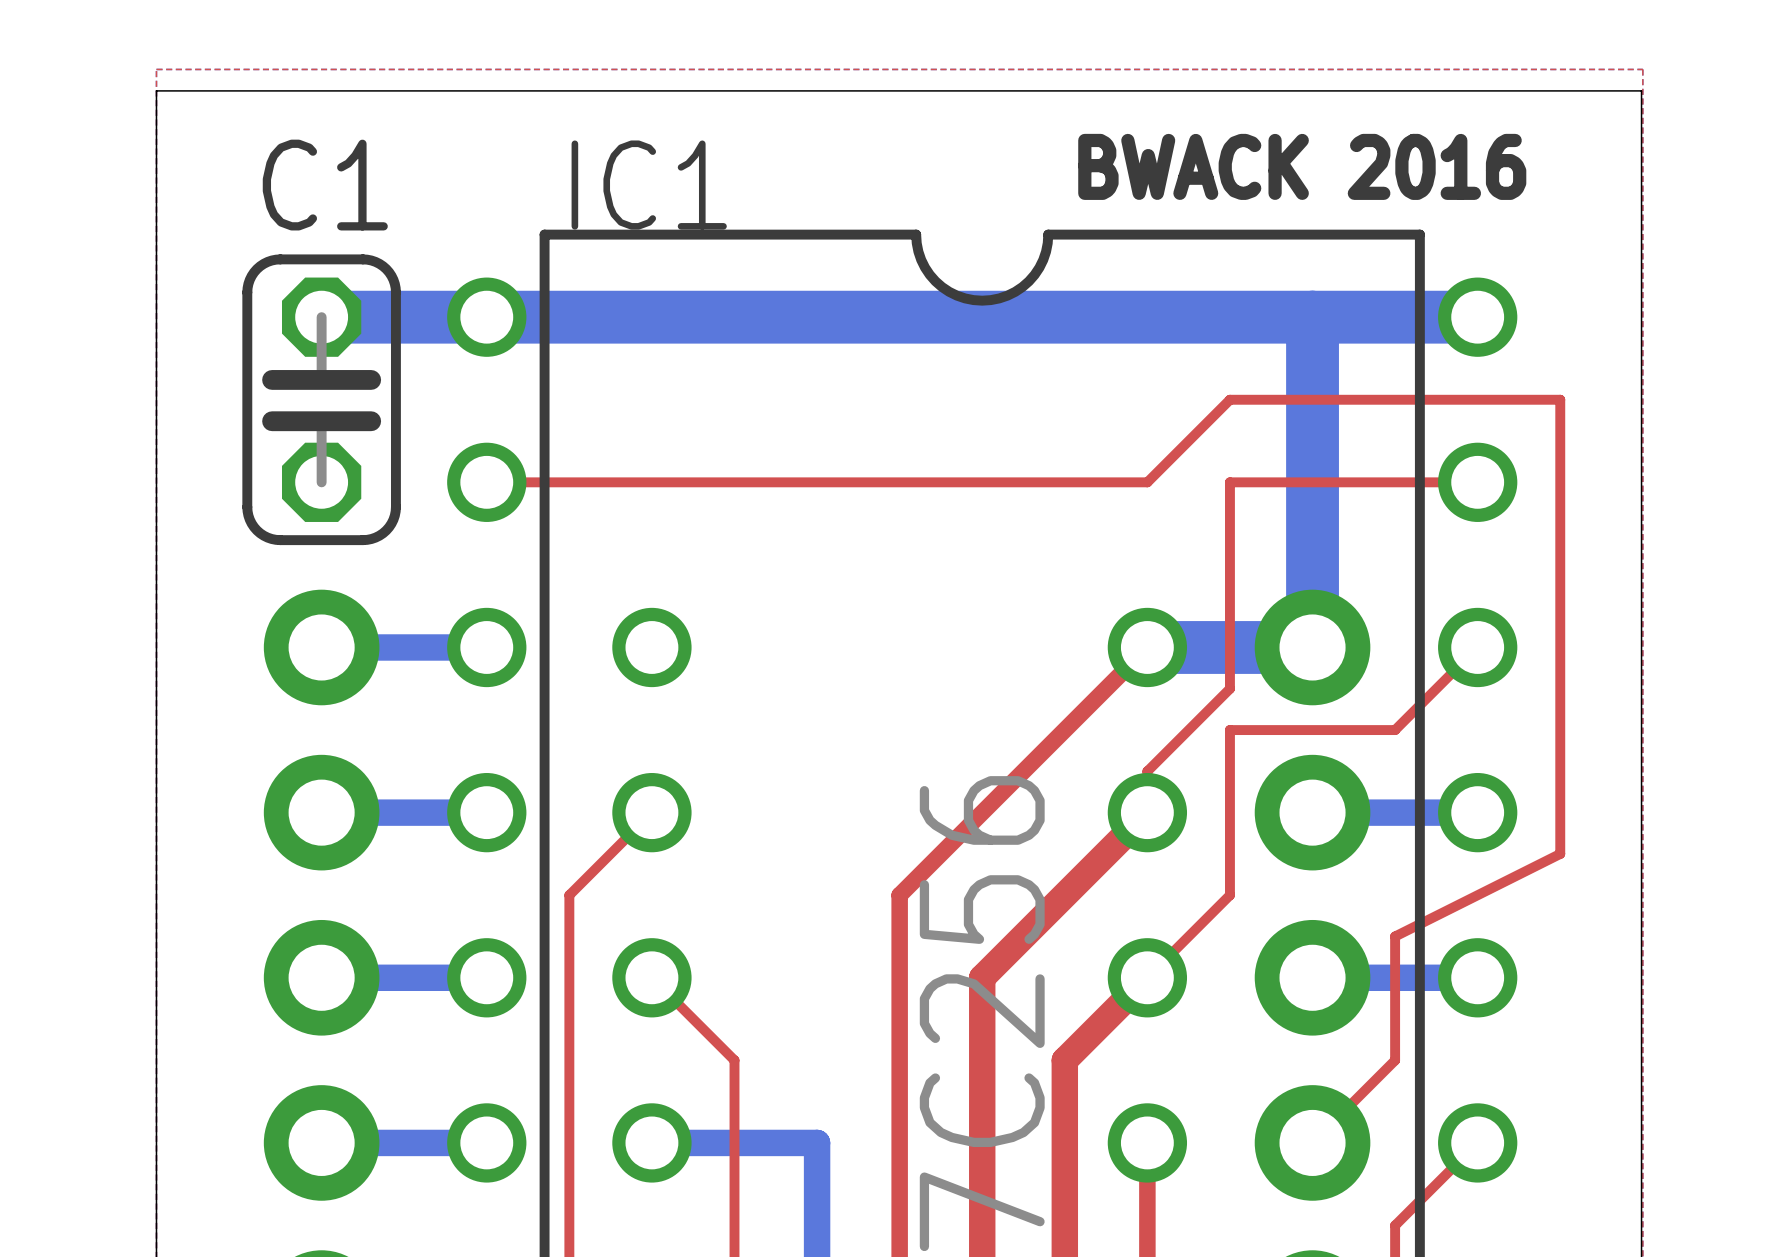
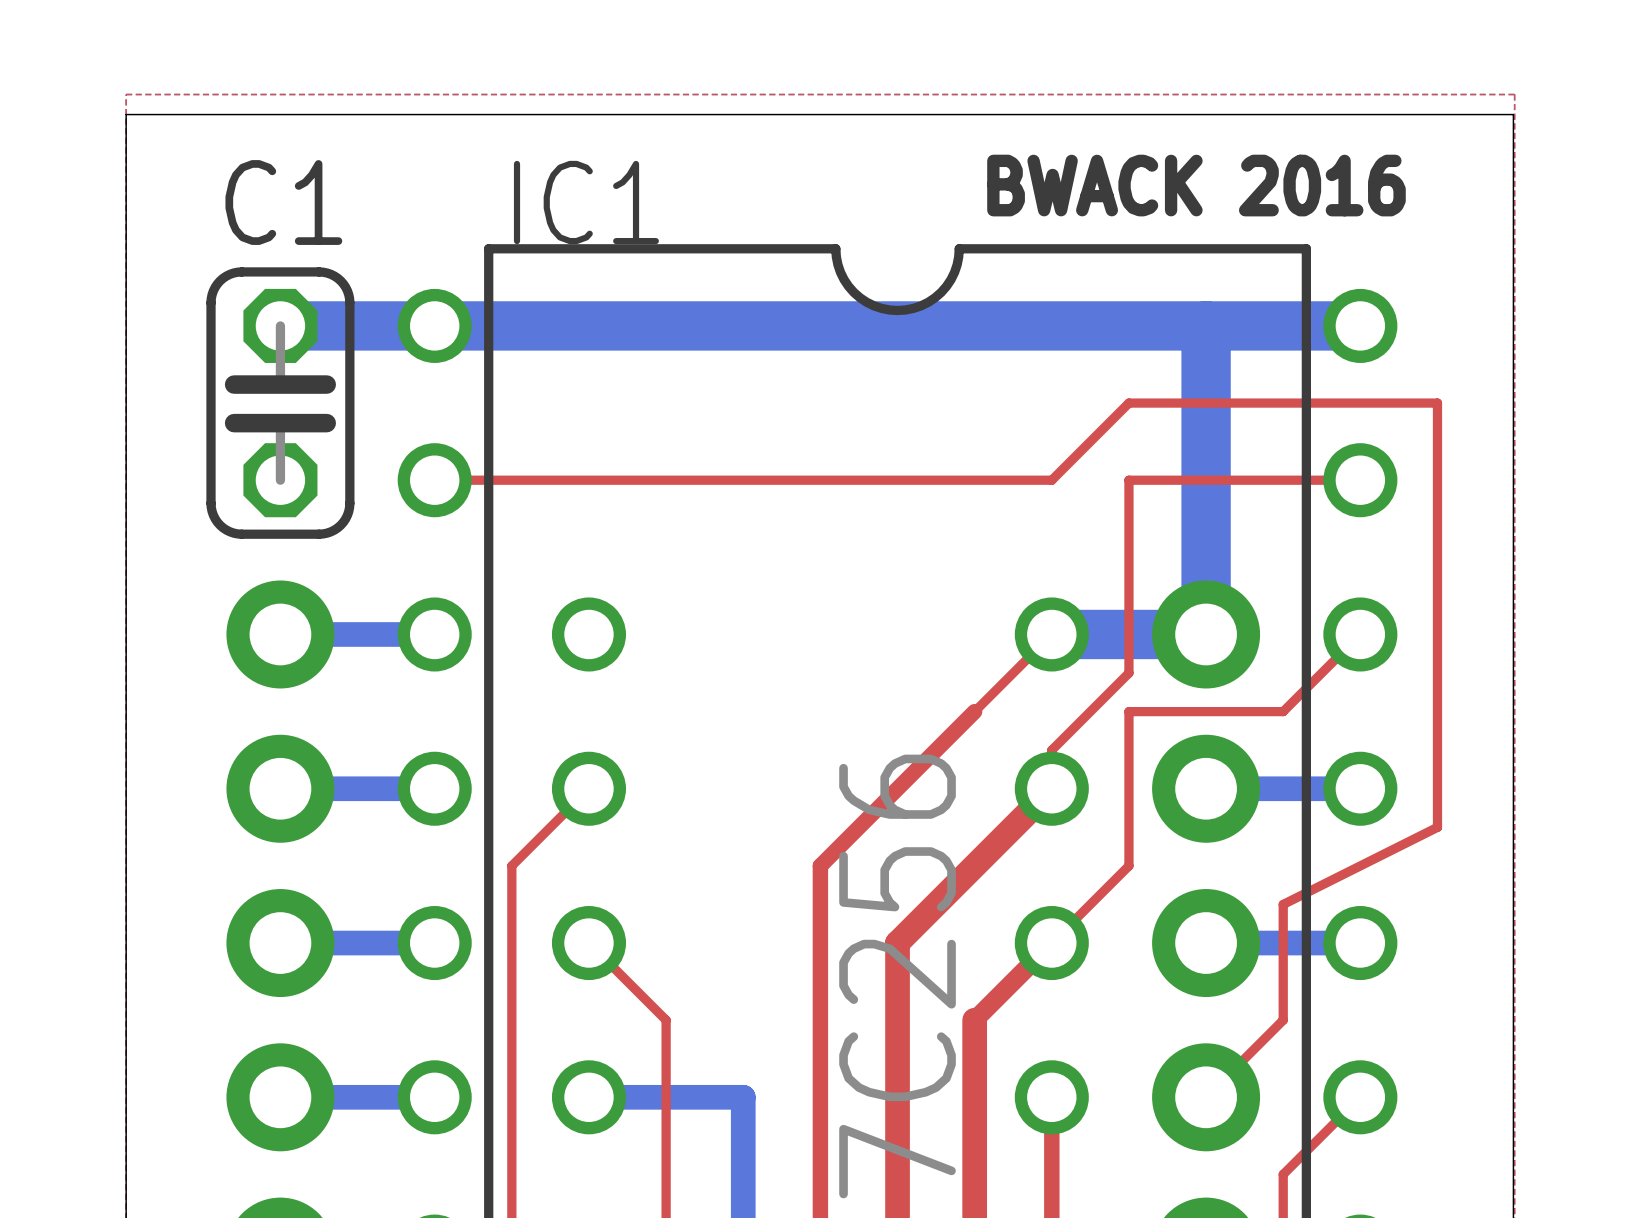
top track width: thick (1147, 647) (1064, 730) -> thin (1051, 634) (974, 711)
top track width: thick (1147, 977) (1064, 1060) -> thin (1051, 943) (974, 1020)

